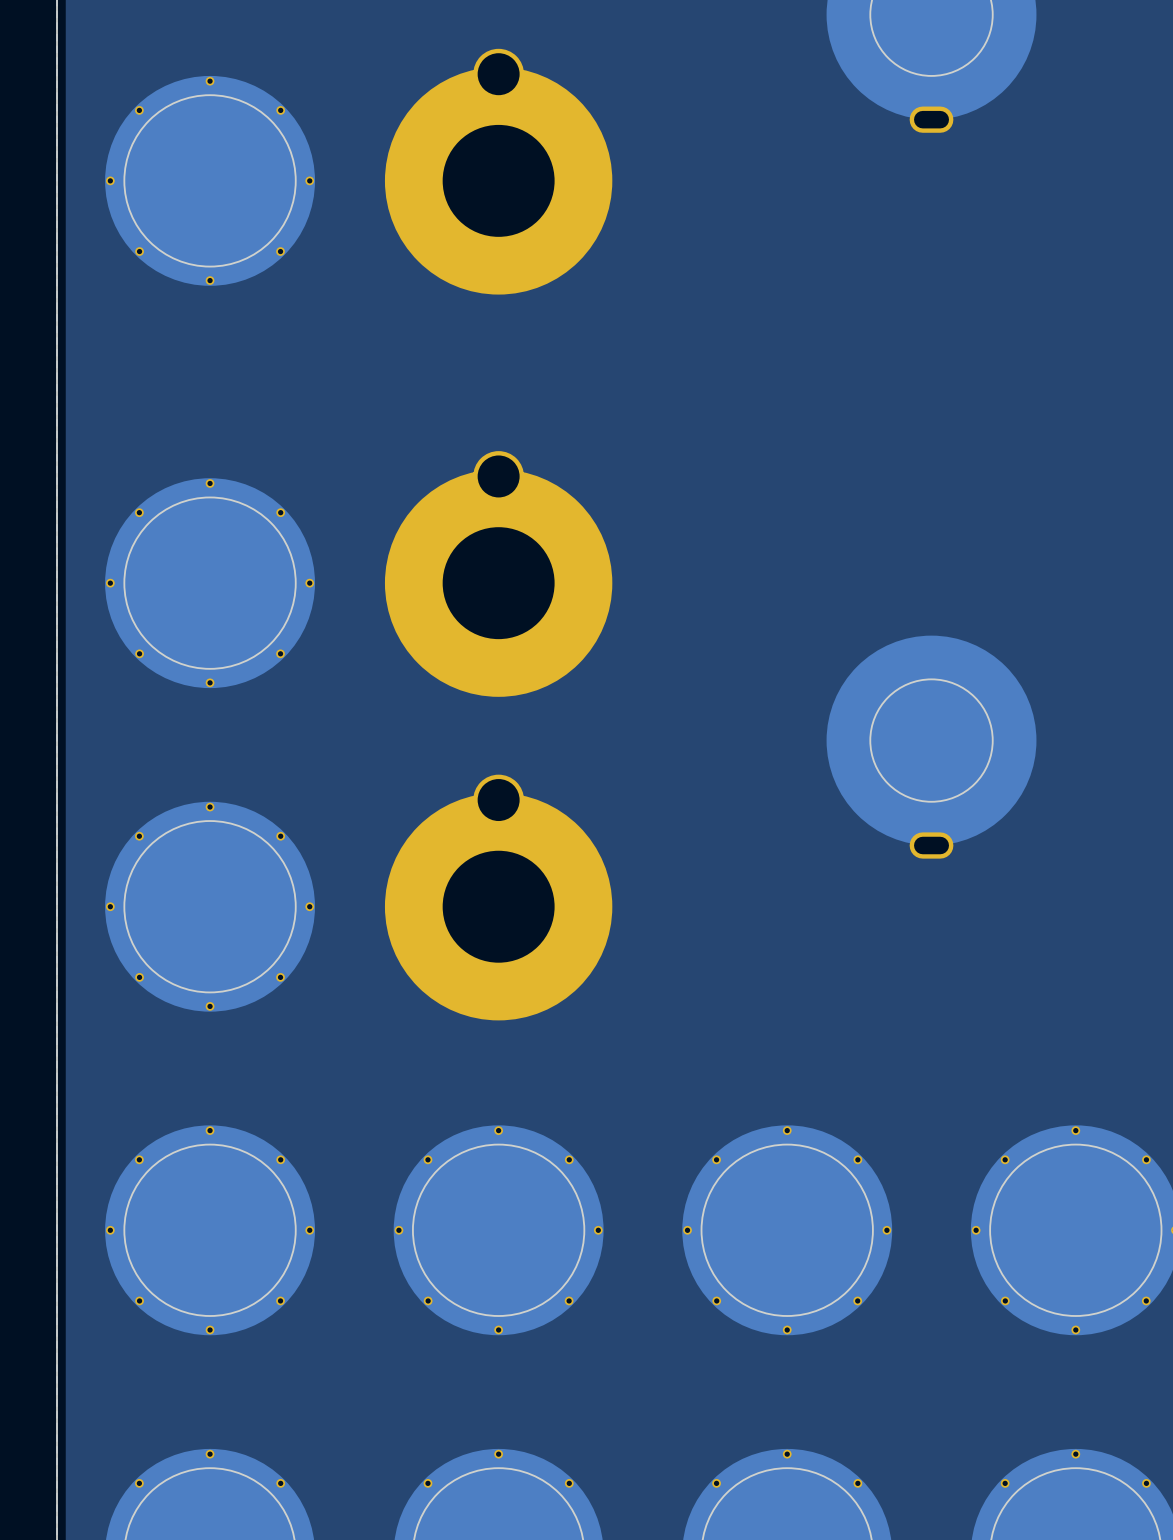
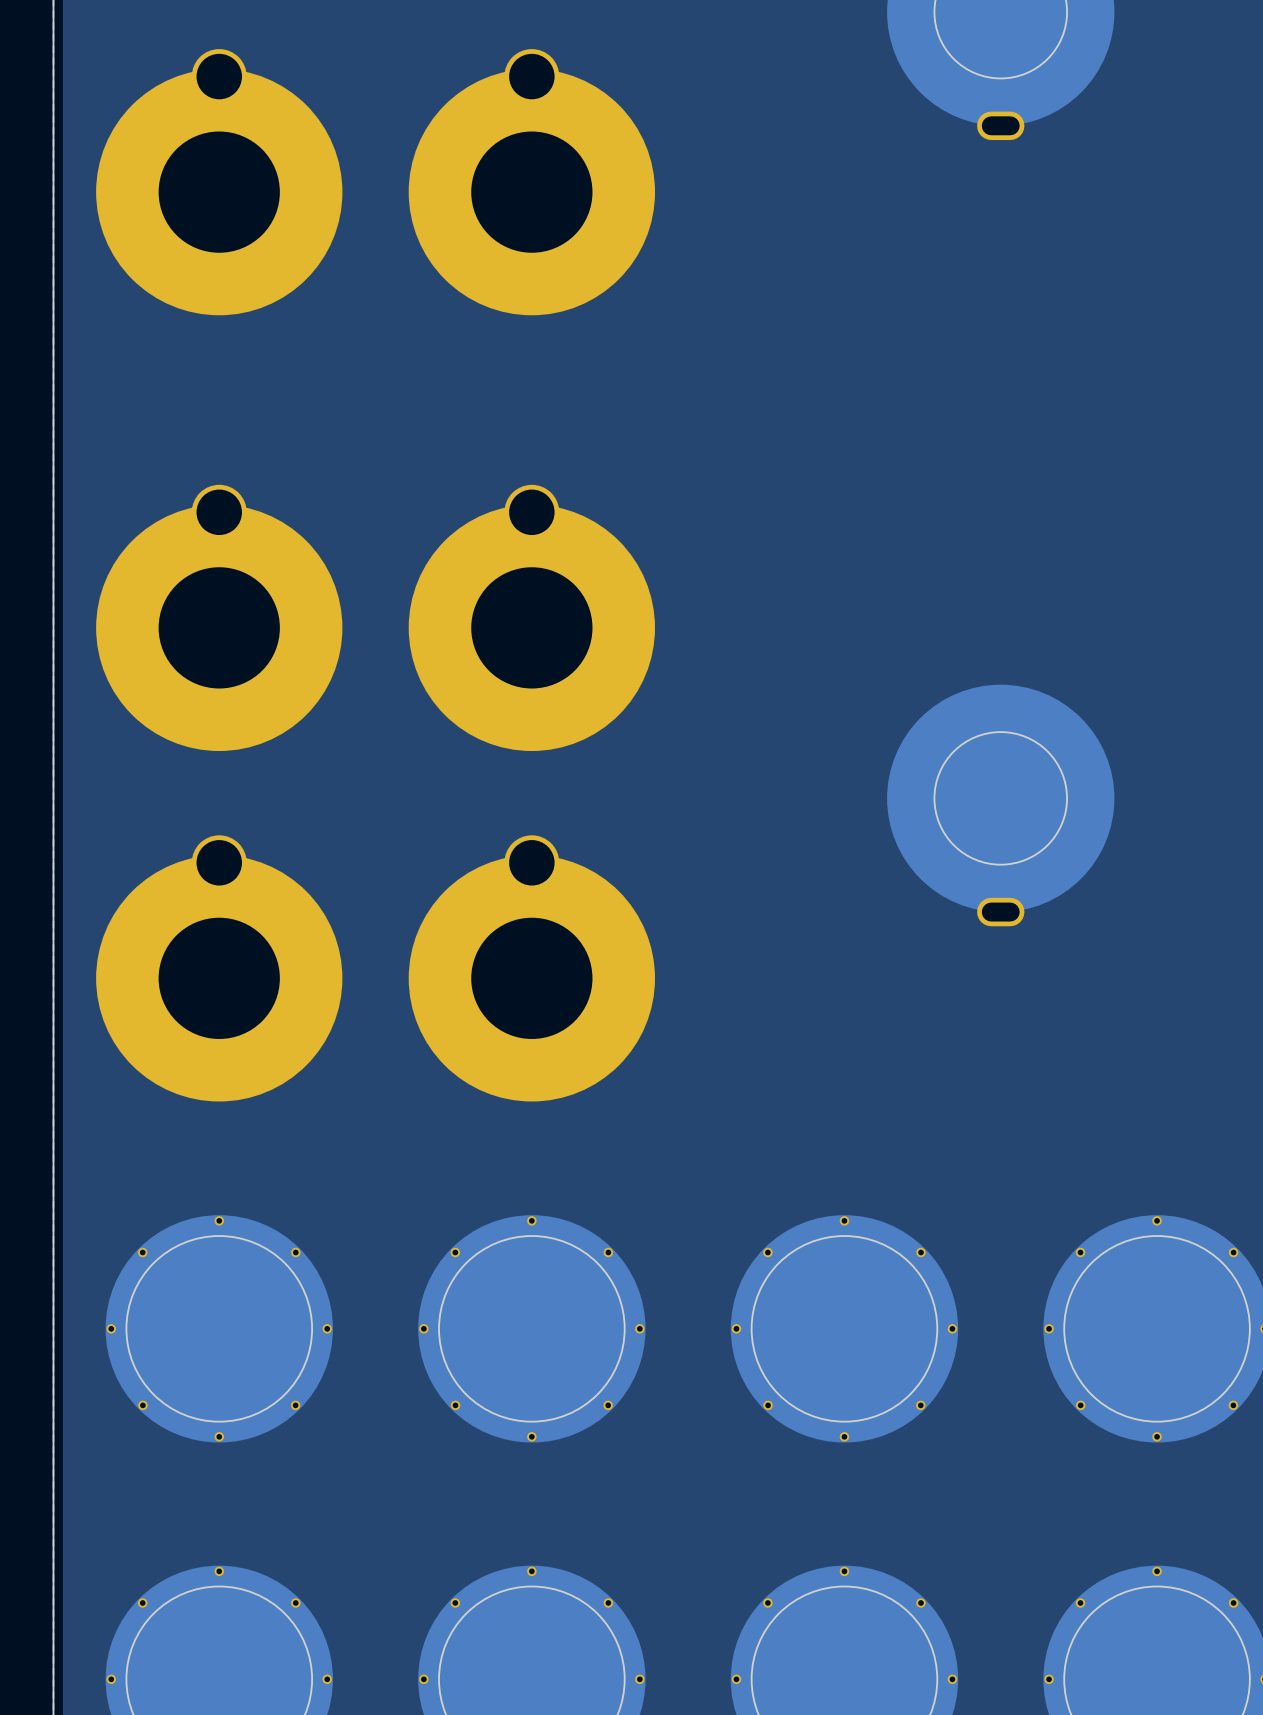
part footprint: [105, 75, 315, 286] -> [96, 49, 343, 316]
part footprint: [105, 478, 315, 689] -> [96, 484, 343, 752]
part footprint: [105, 801, 315, 1012] -> [96, 835, 343, 1102]

